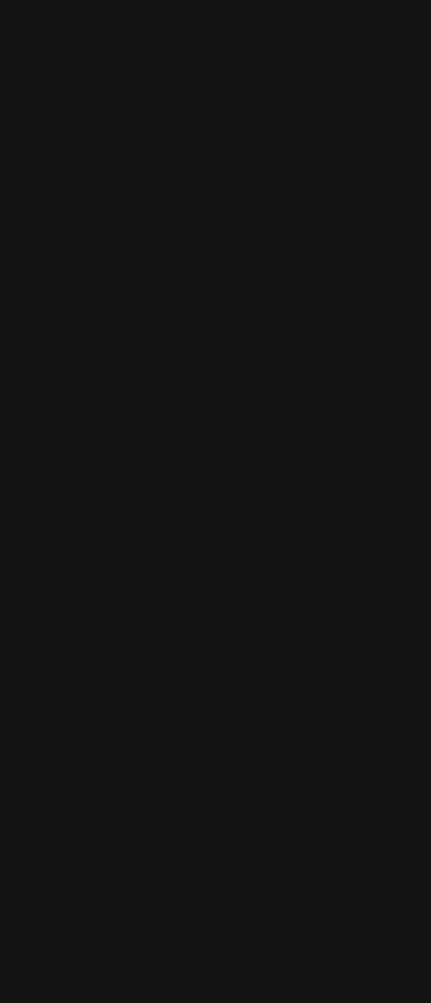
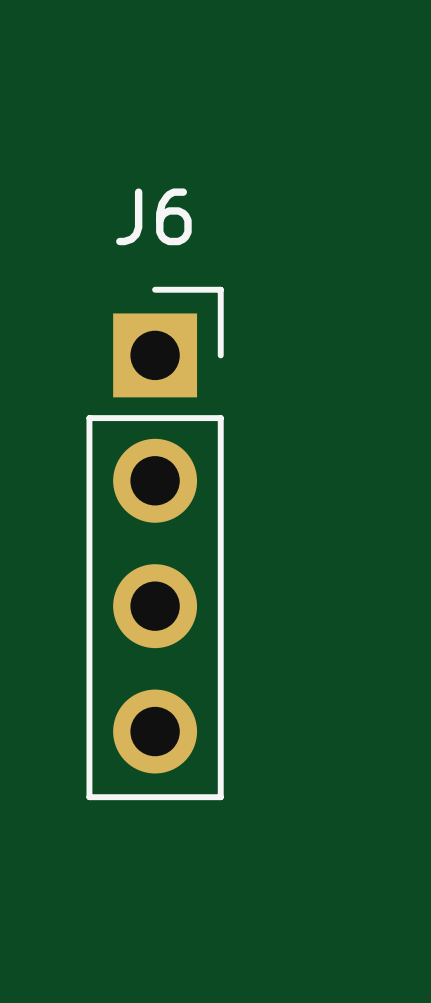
J6: none -> (155, 543)

